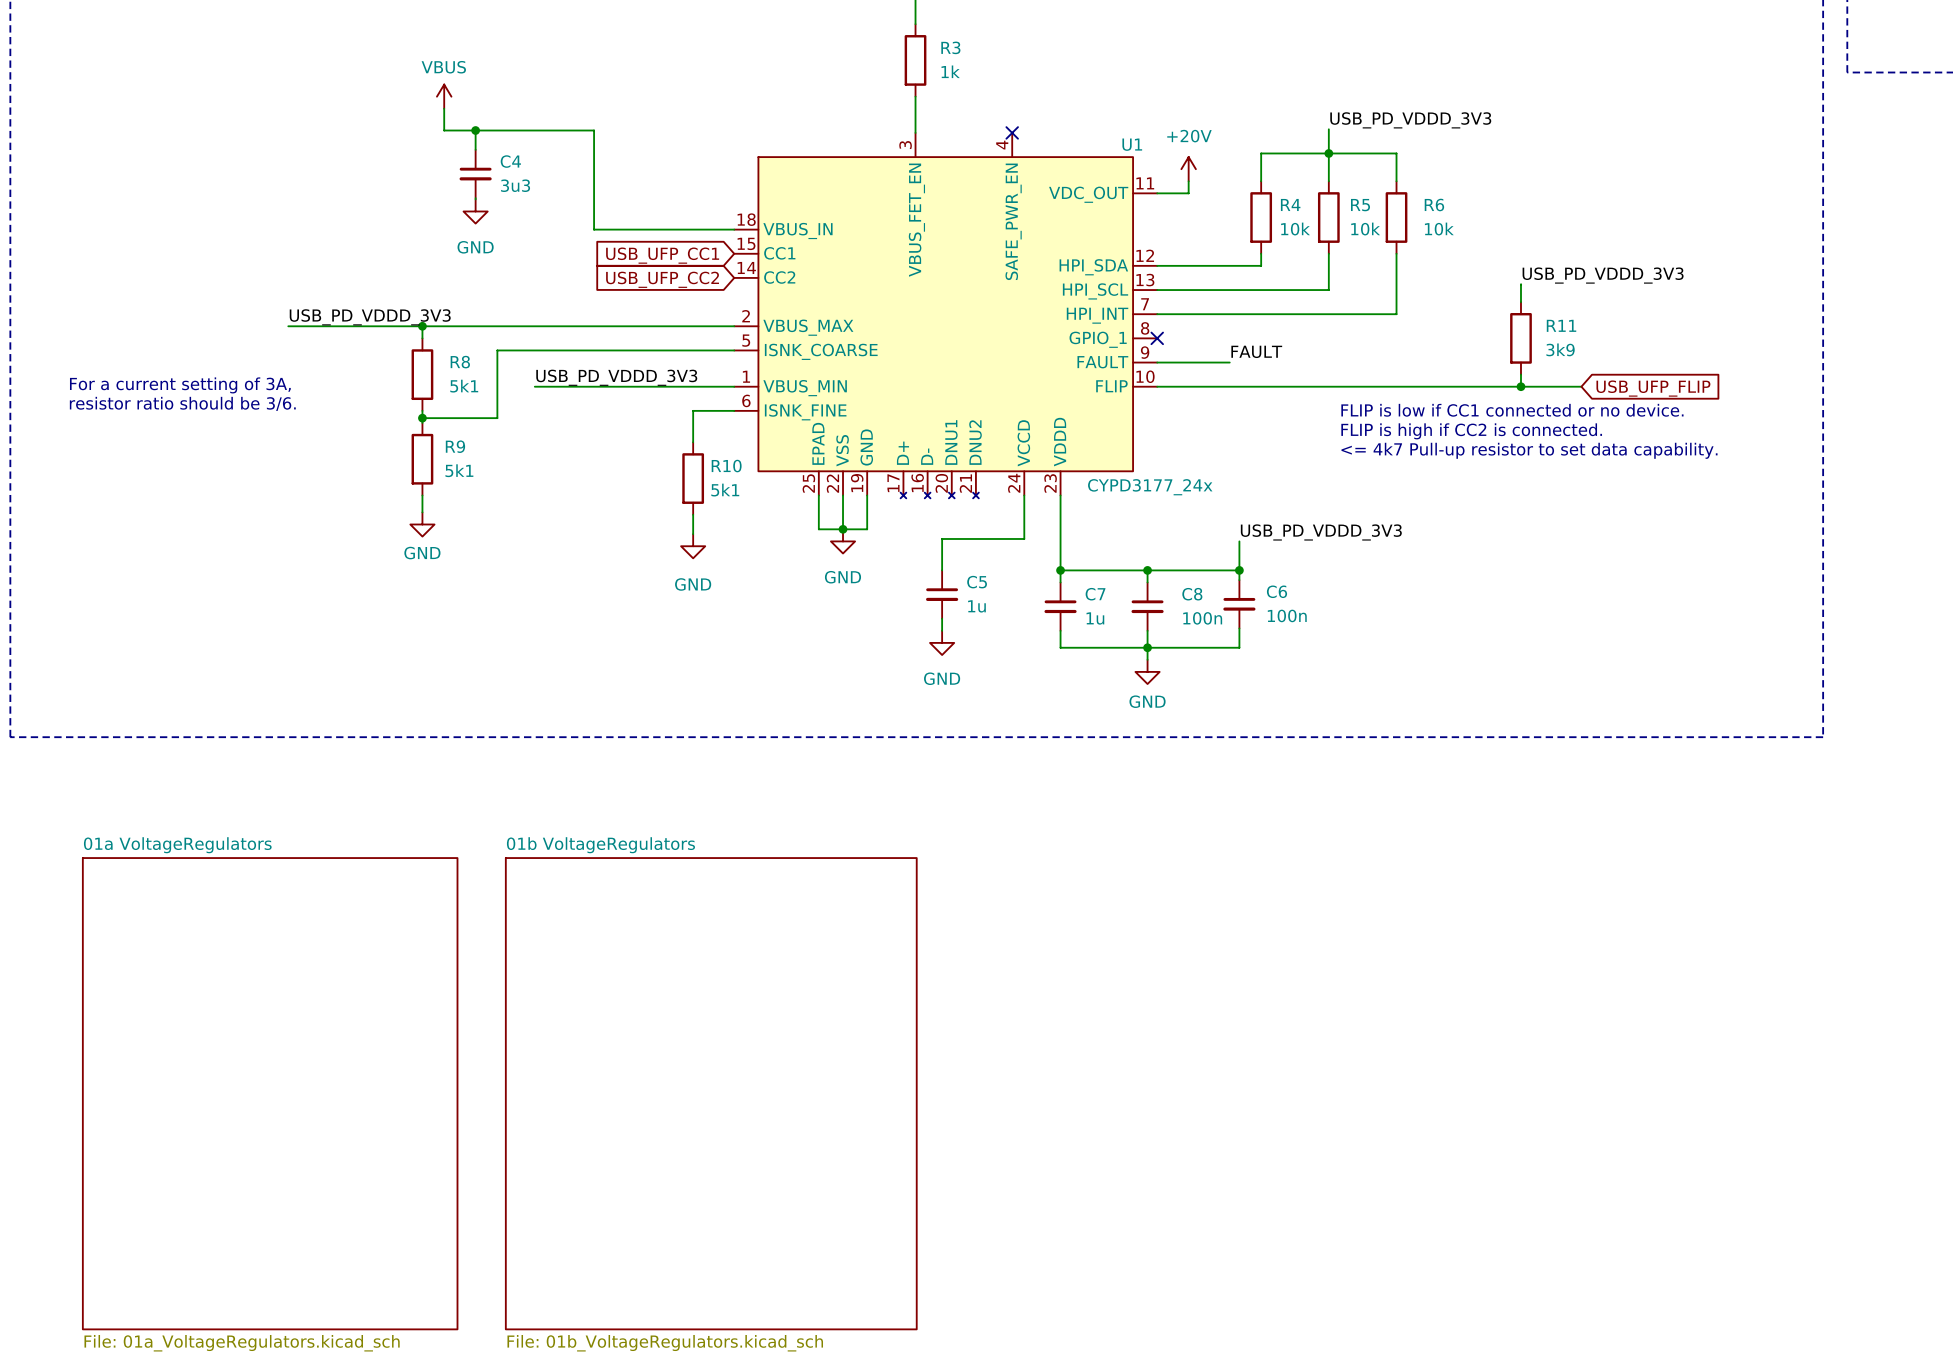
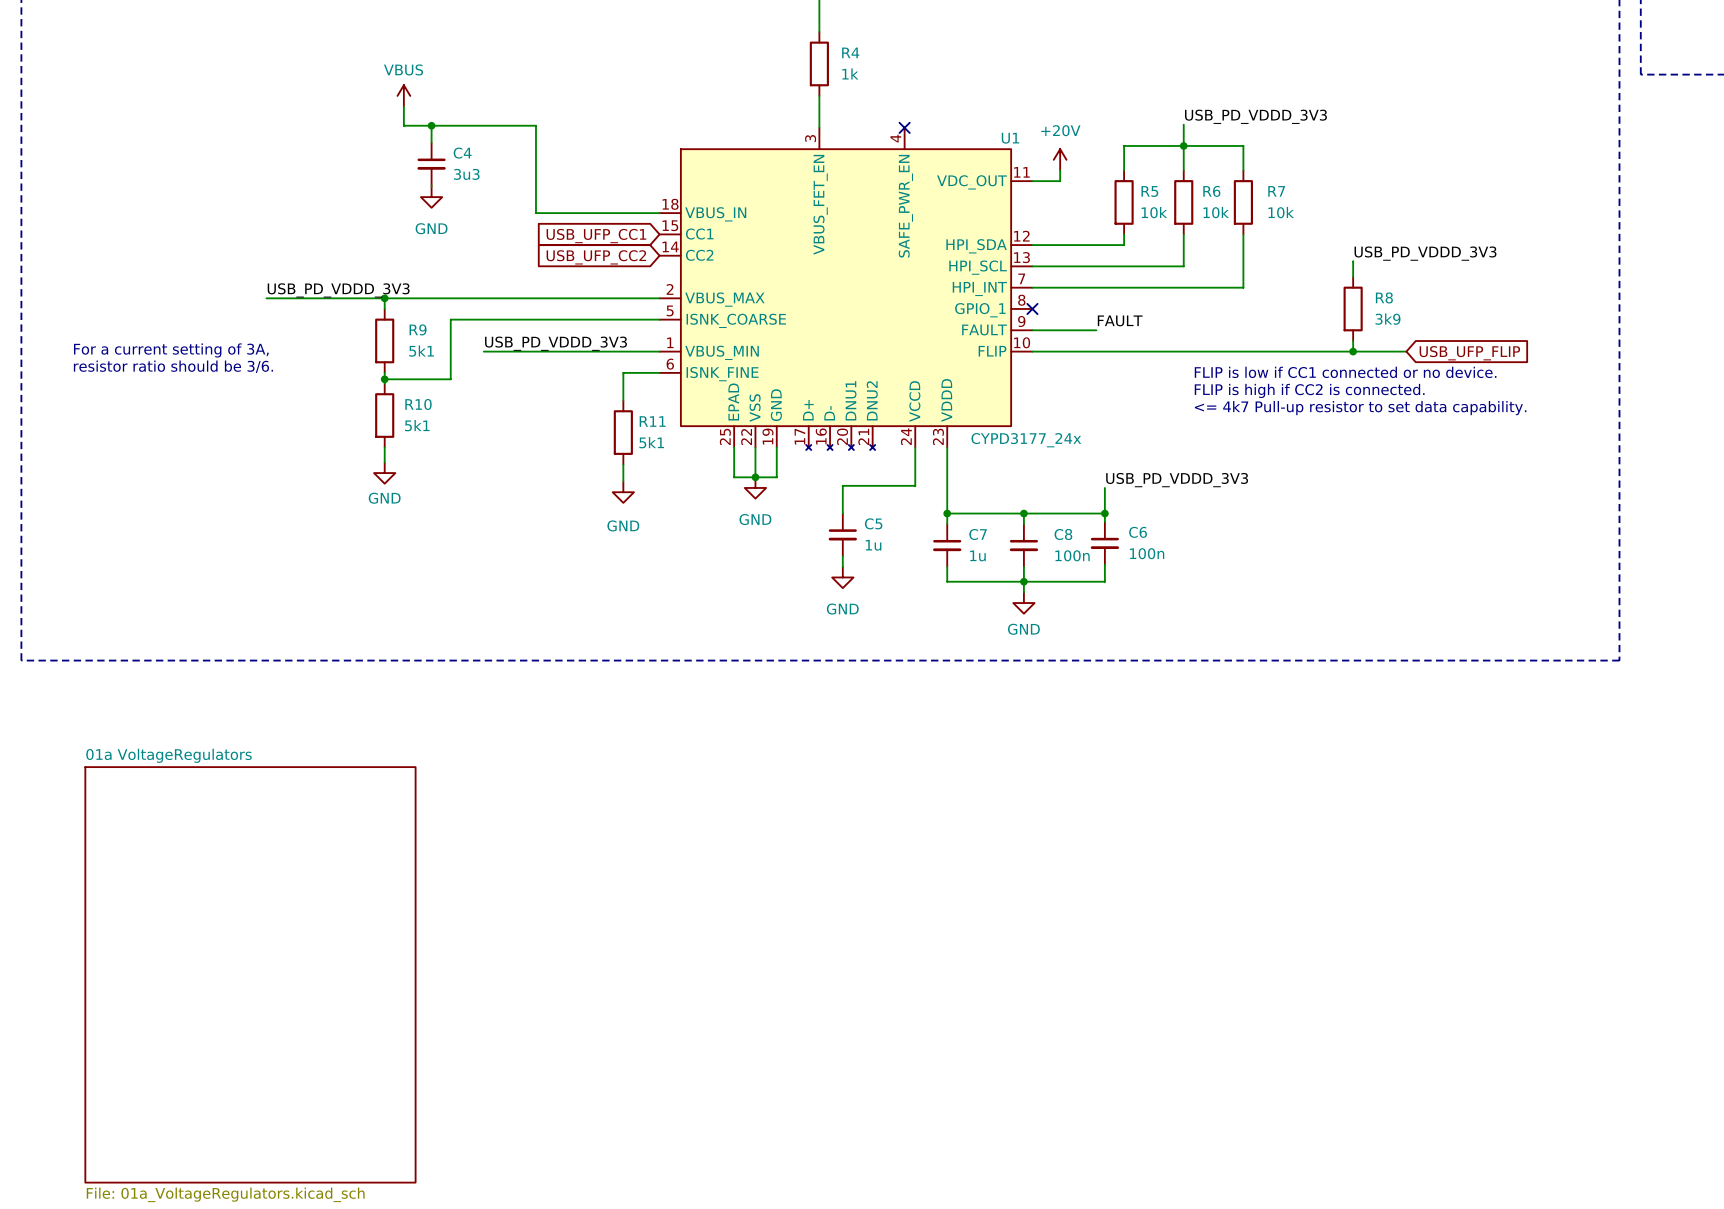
R3 name: R3 (950, 47) -> R4 (850, 52)
R4 name: R4 (1290, 204) -> R5 (1149, 191)
R6 name: R6 (1434, 204) -> R7 (1276, 191)
R5 name: R5 (1360, 205) -> R6 (1211, 191)
R11 name: R11 (1561, 325) -> R8 (1384, 297)
R8 name: R8 (460, 362) -> R9 (418, 329)
R9 name: R9 (455, 446) -> R10 (418, 404)
R10 name: R10 (726, 466) -> R11 (652, 421)
sheet 01b VoltageRegulators: File: 01b_VoltageRegulators.kicad_sch (711, 1093) -> none

